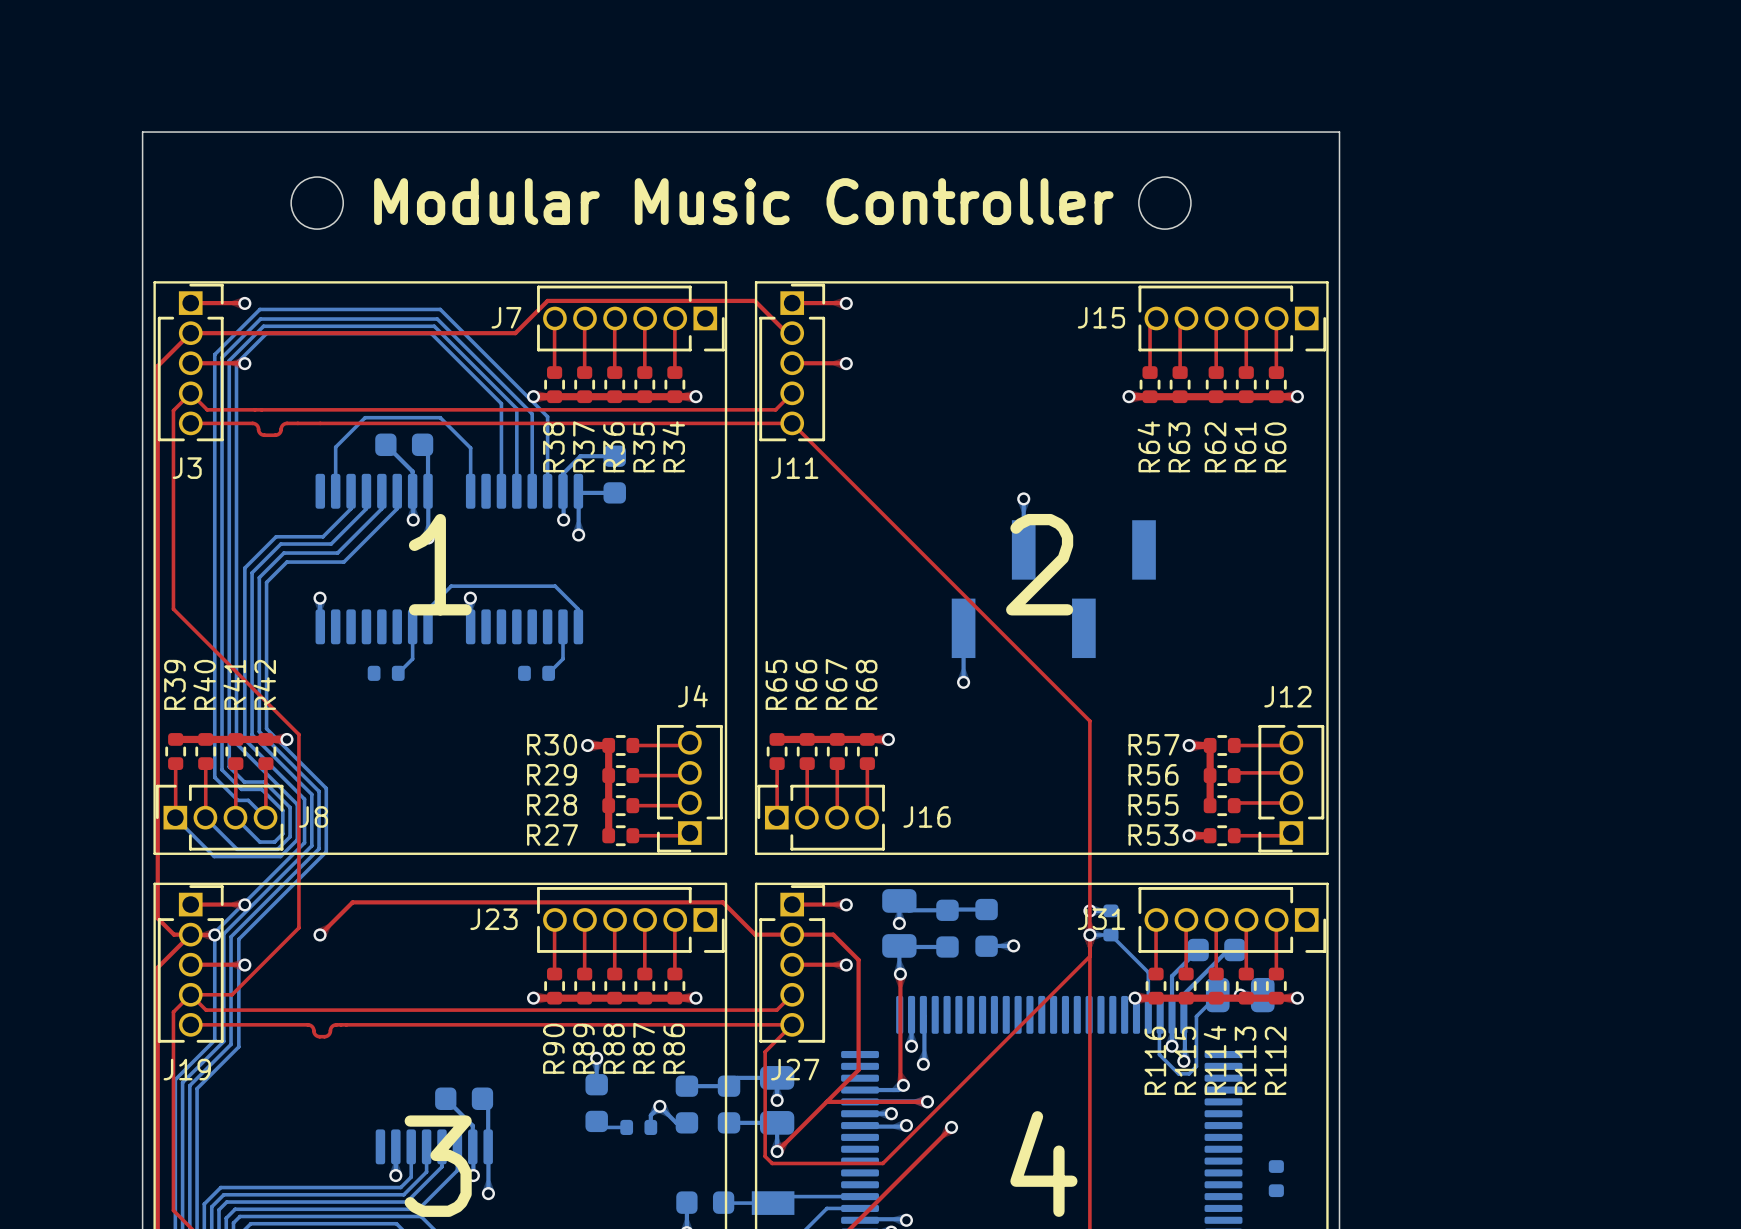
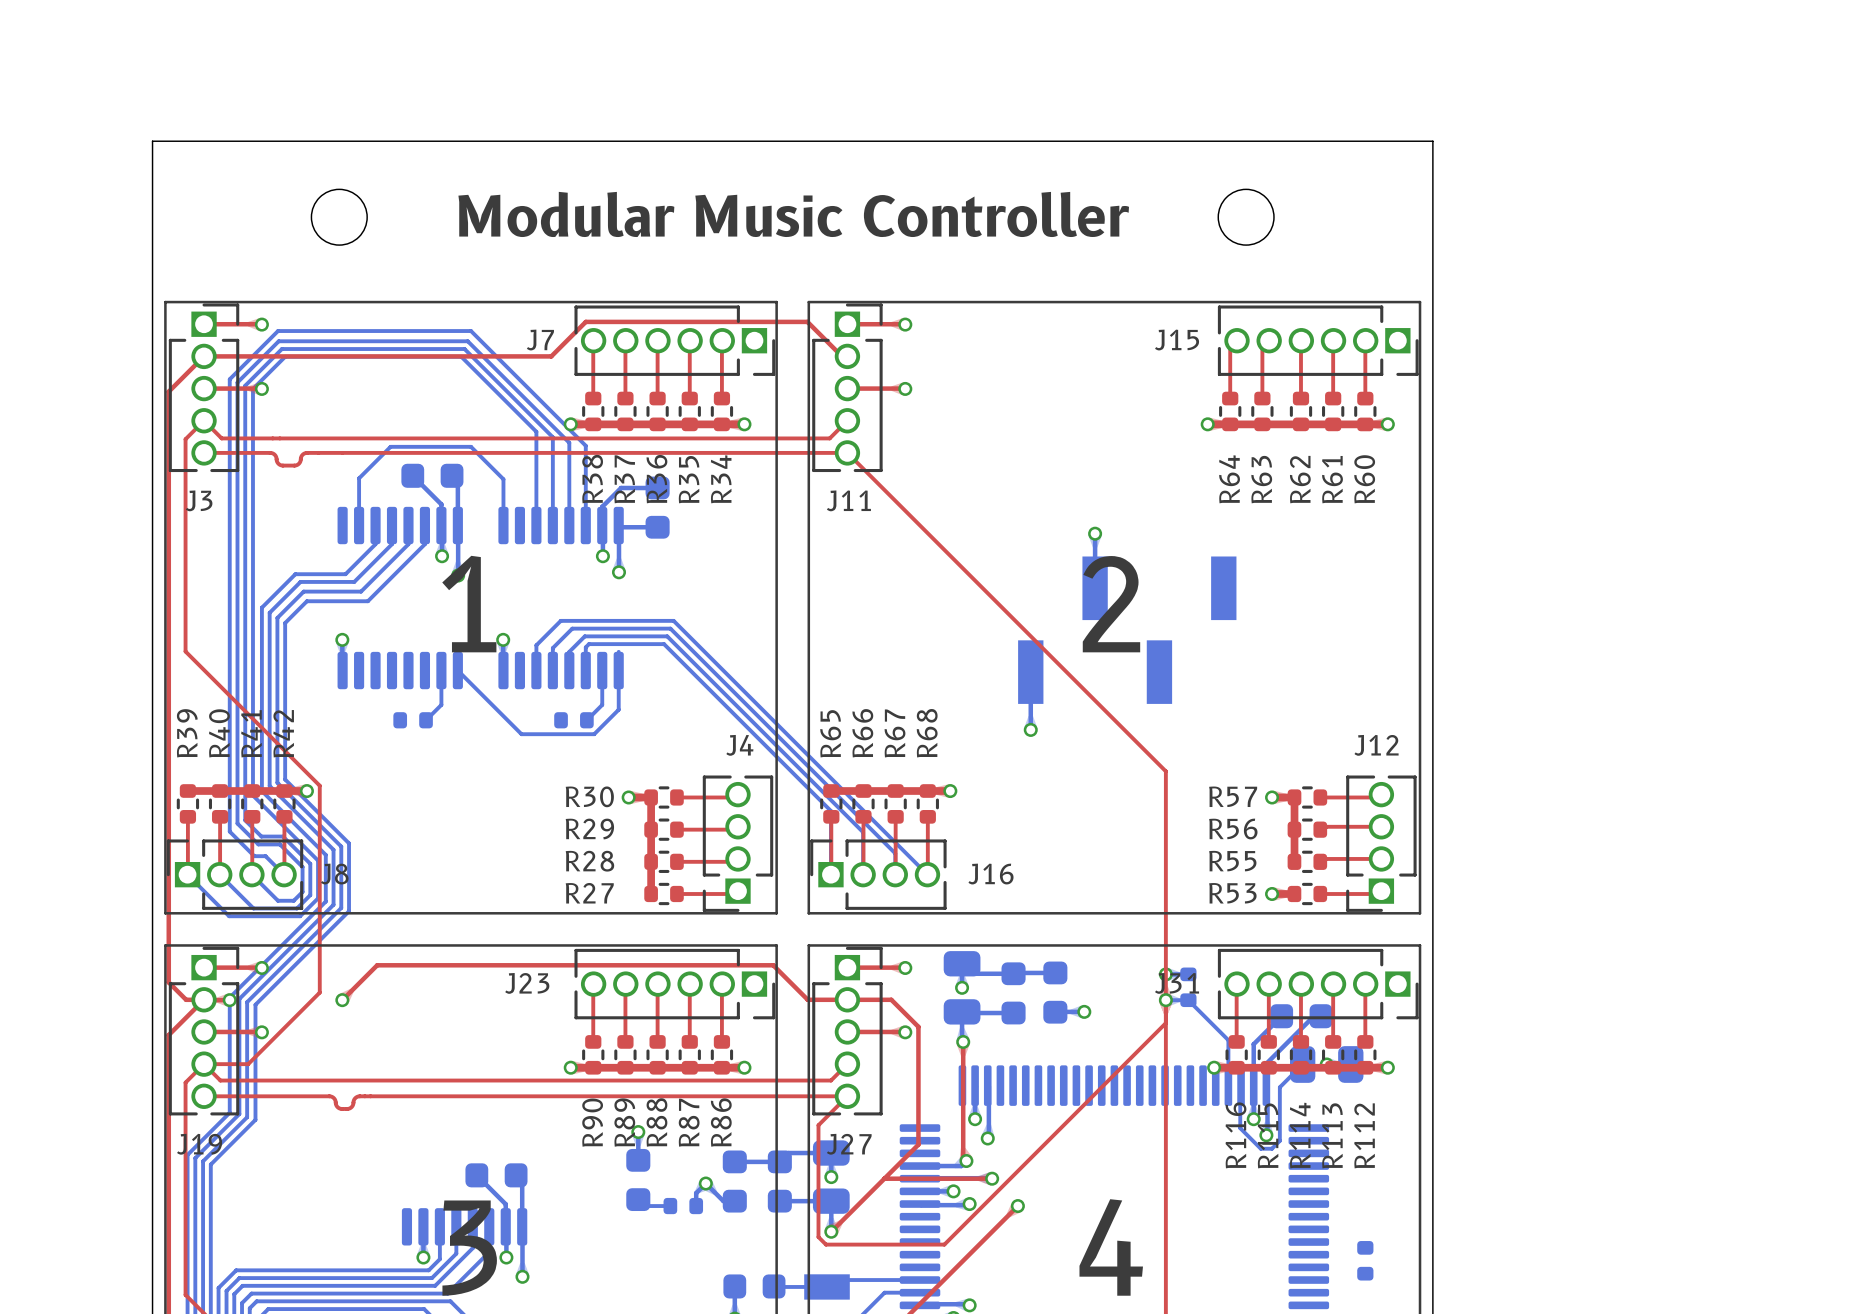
bottom track: (428, 609) (451, 586) (555, 586) (578, 609) -> none
bottom track: none -> (457, 670) (521, 734) (594, 734) (618, 709) (618, 670)
bottom track: none -> (536, 670) (536, 645) (560, 620) (673, 620) (927, 874)
bottom track: none -> (552, 670) (552, 648) (572, 628) (670, 628) (895, 853) (895, 874)
bottom track: none -> (569, 670) (569, 651) (584, 636) (667, 636) (863, 832) (863, 874)
bottom track: none -> (585, 670) (585, 647) (589, 644) (664, 644) (830, 811) (830, 874)

